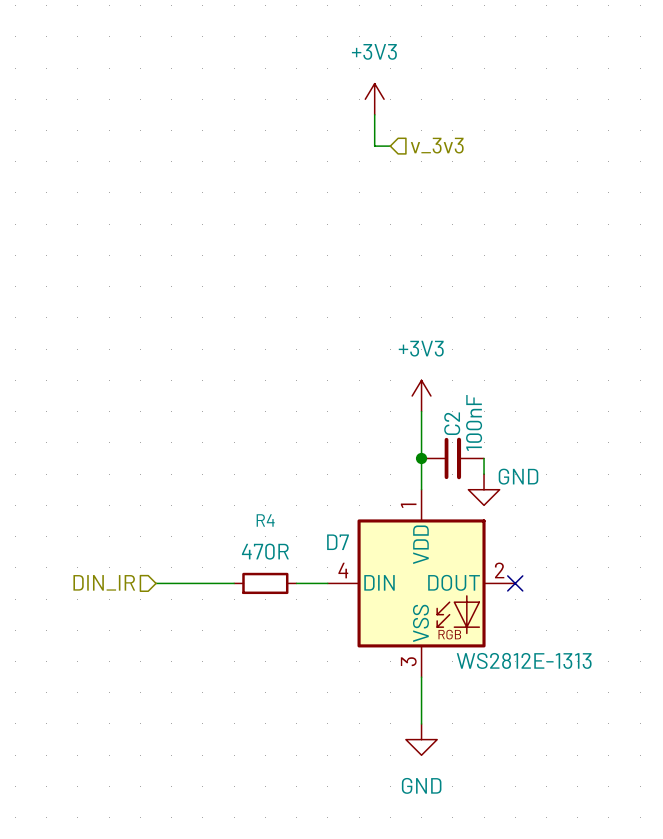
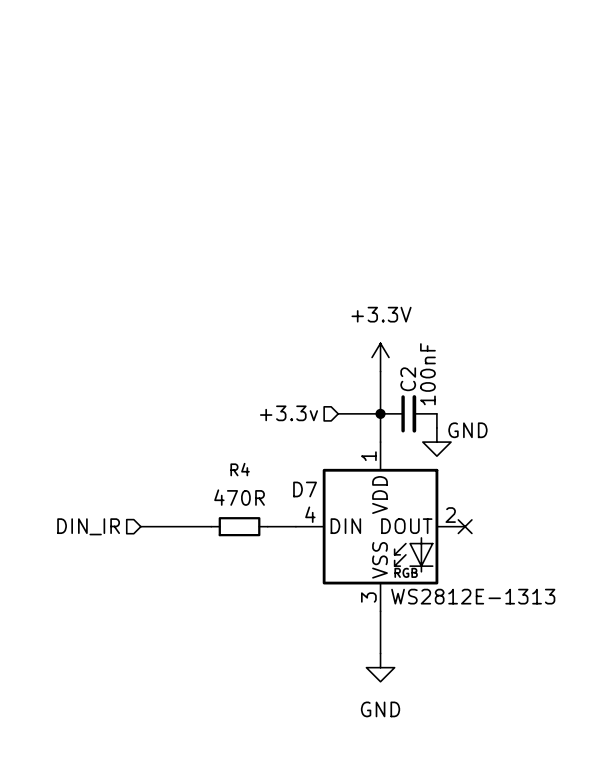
power symbol: +3V3 (374, 99) -> none
wire: (374, 114) (374, 146) (390, 146) -> none
hierarchical label: v_3v3 (437, 145) -> none
power symbol: +3V3 (421, 396) -> +3.3V (380, 357)
hierarchical label: none -> +3.3v (289, 413)
wire: none -> (338, 413) (380, 413)

